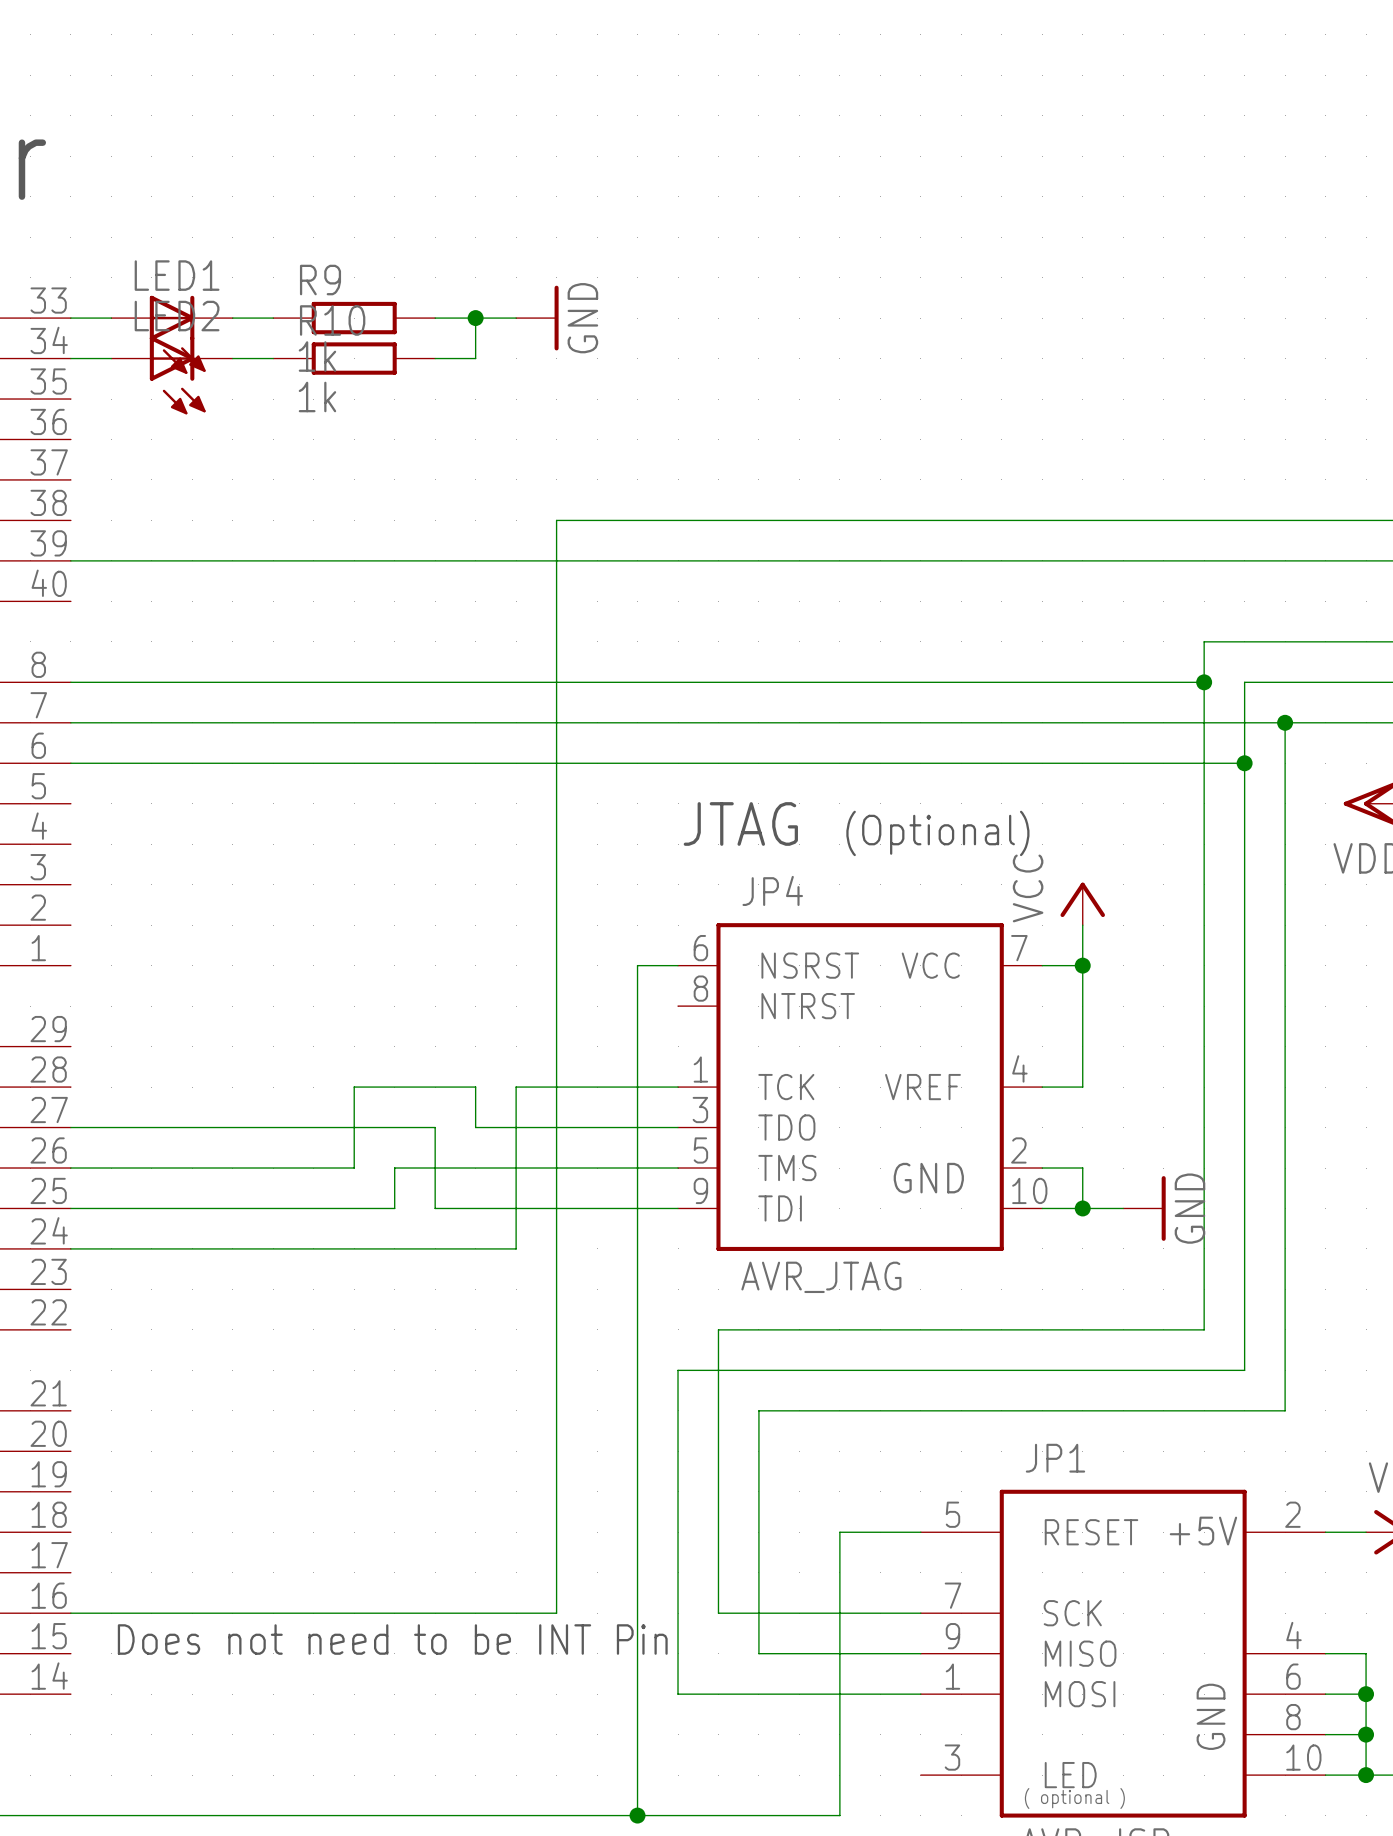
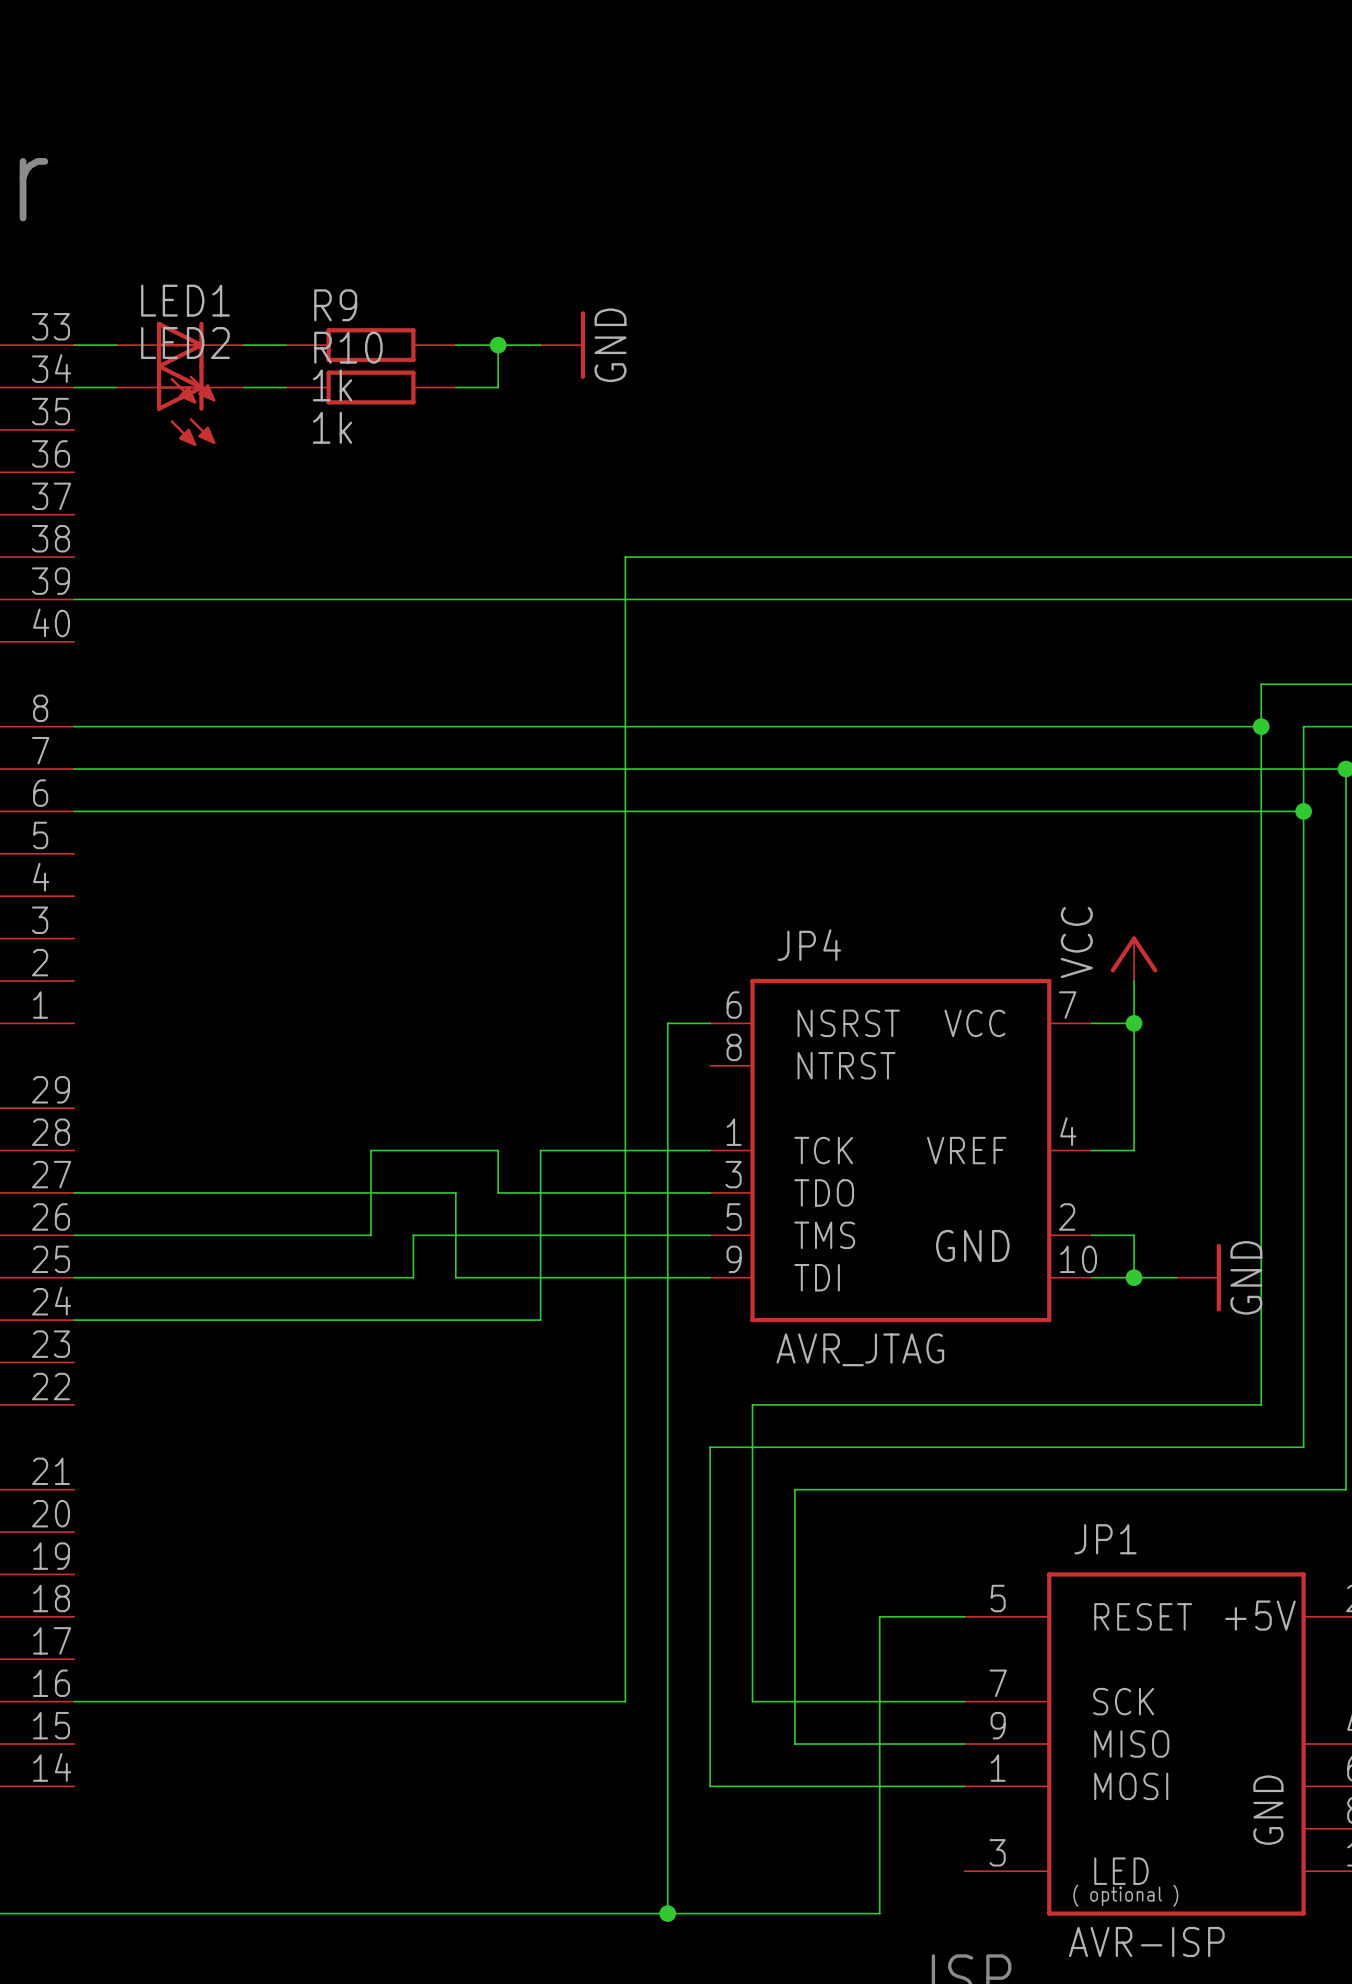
wire: (597, 520) (556, 520) (556, 1613) -> (625, 557) (625, 1701) (582, 1701)
text: JTAG (740, 823) -> none
text: (Optional) (937, 833) -> none
text: Does not need to be INT Pin (392, 1639) -> none

